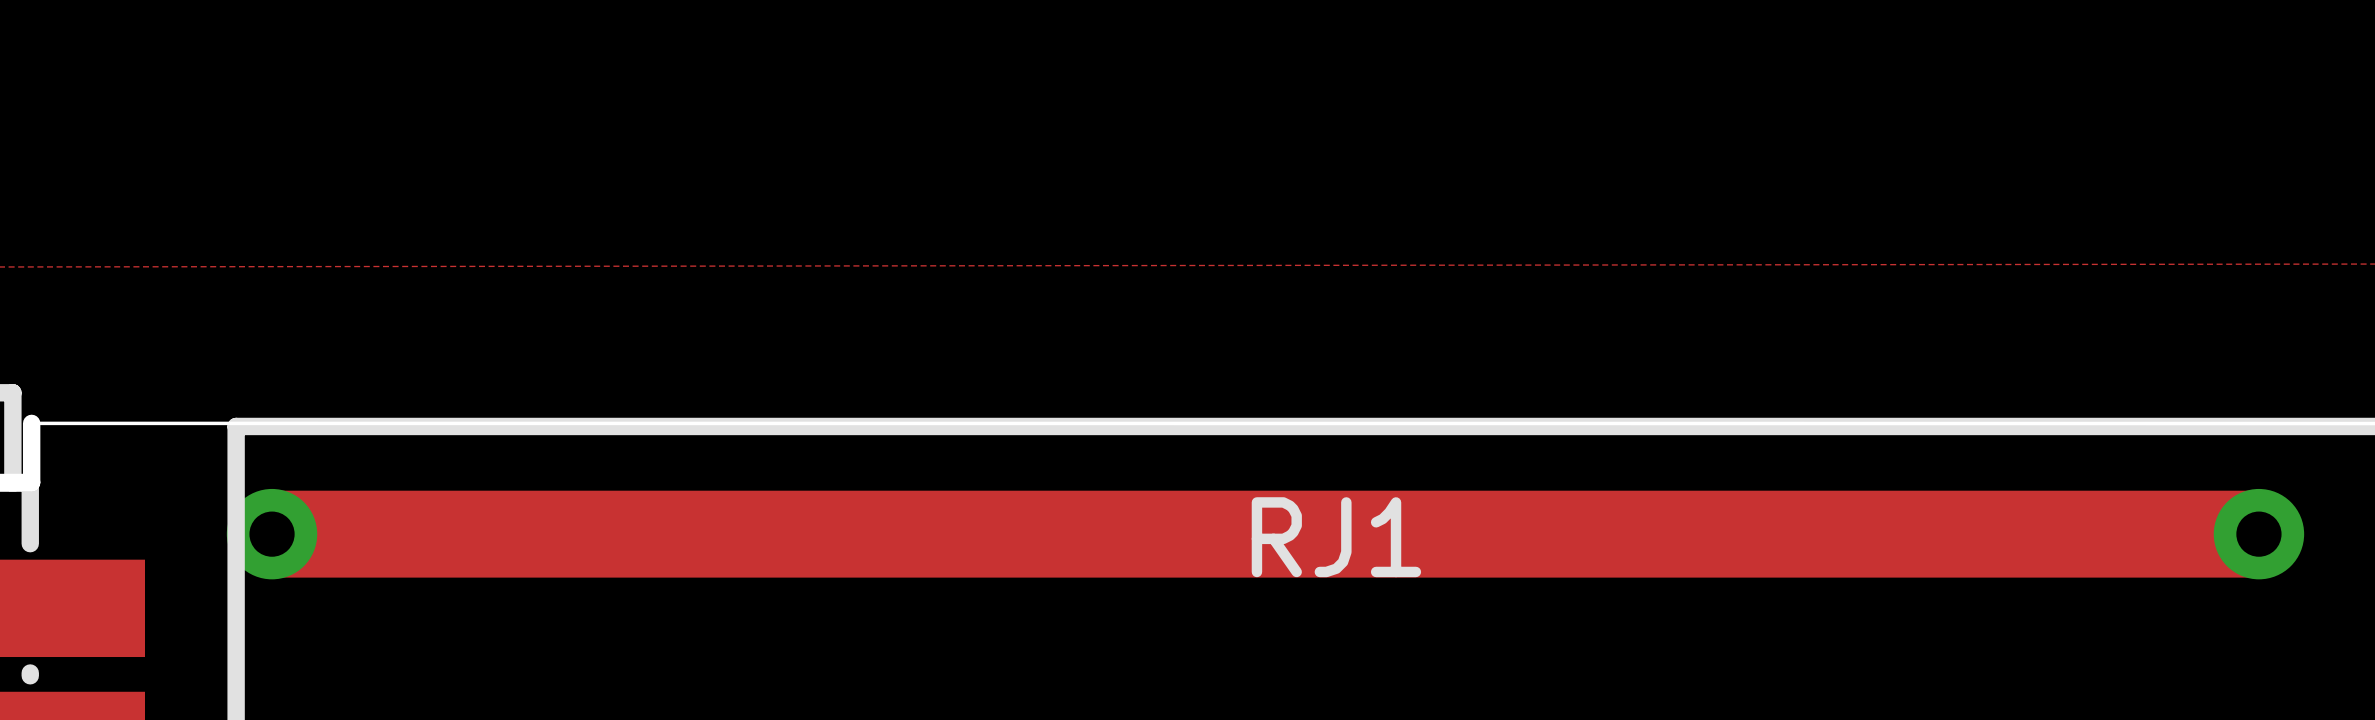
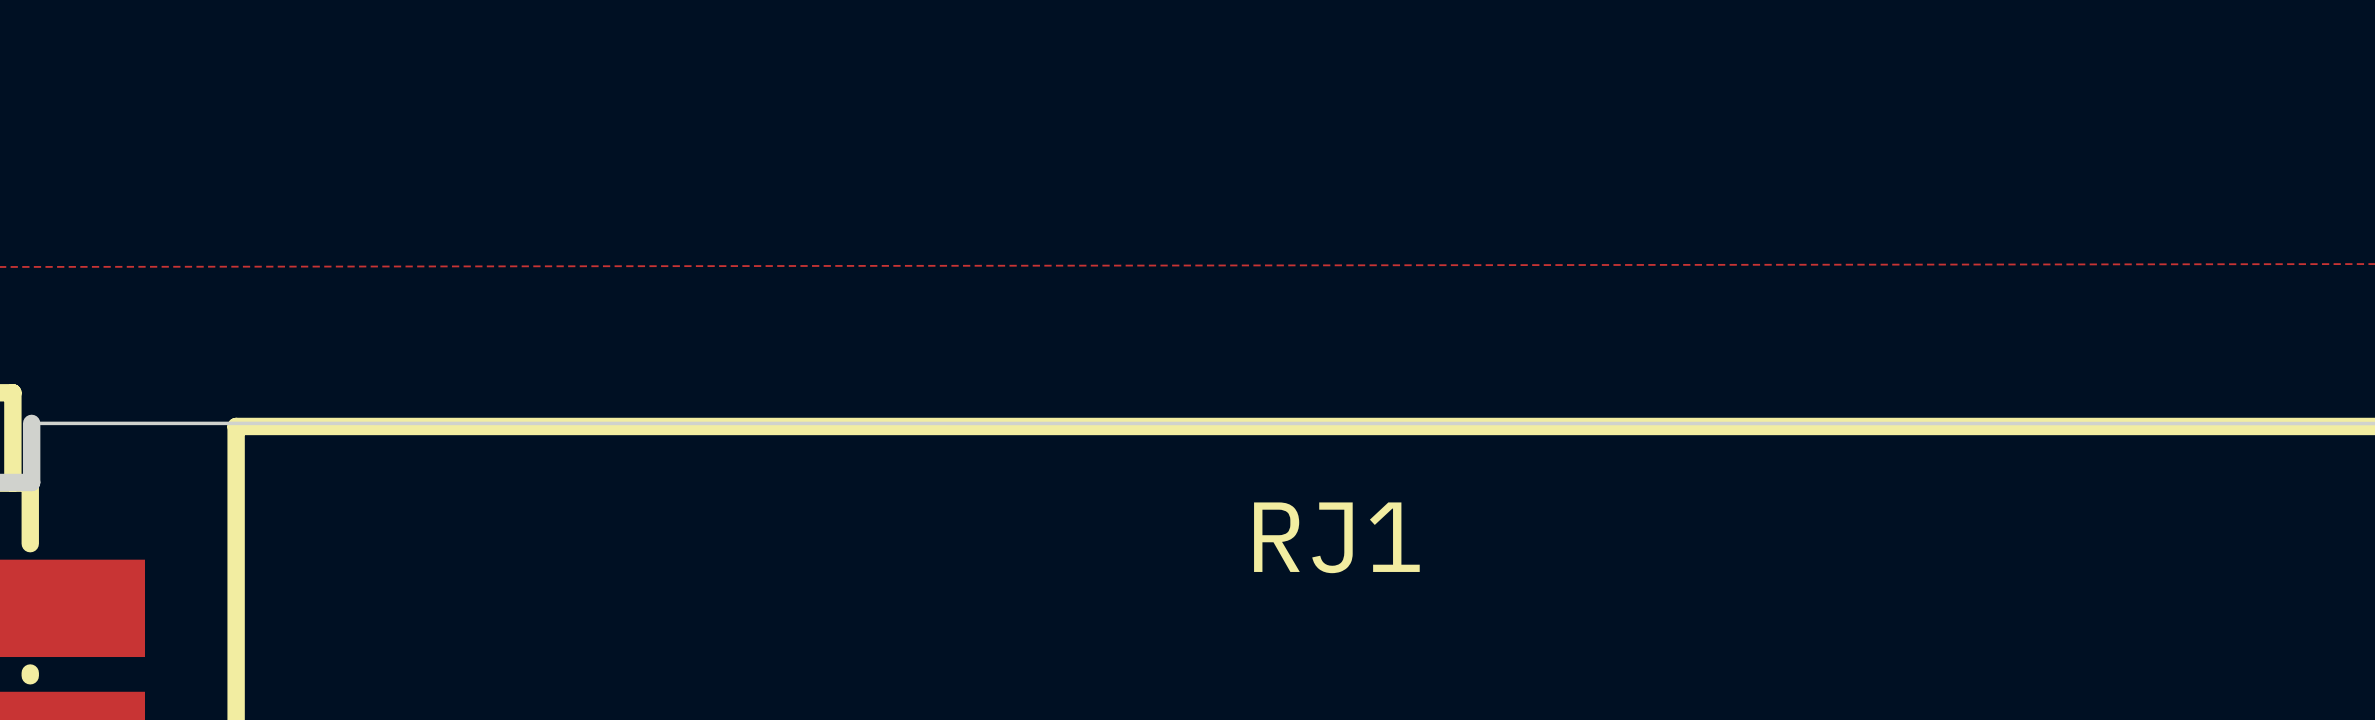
track: (272, 534) (2258, 534) -> none
via: (272, 534) -> none
via: (2258, 534) -> none

